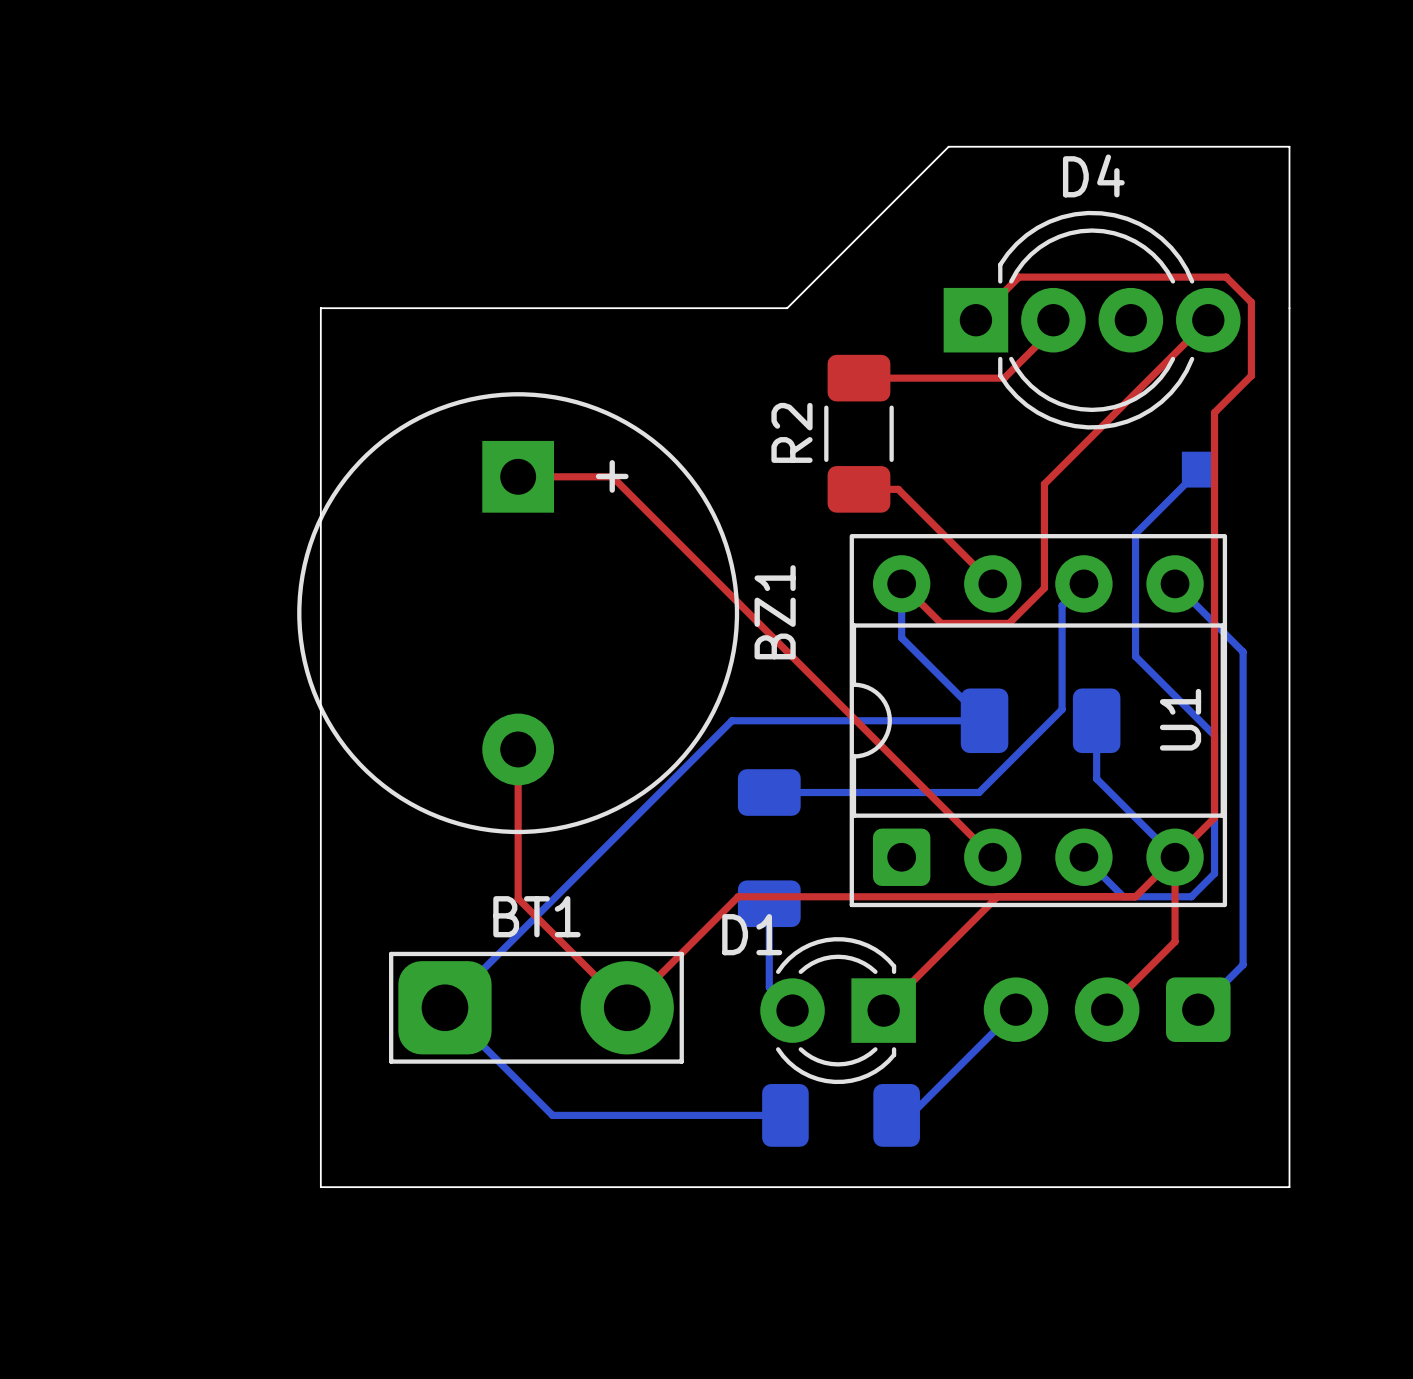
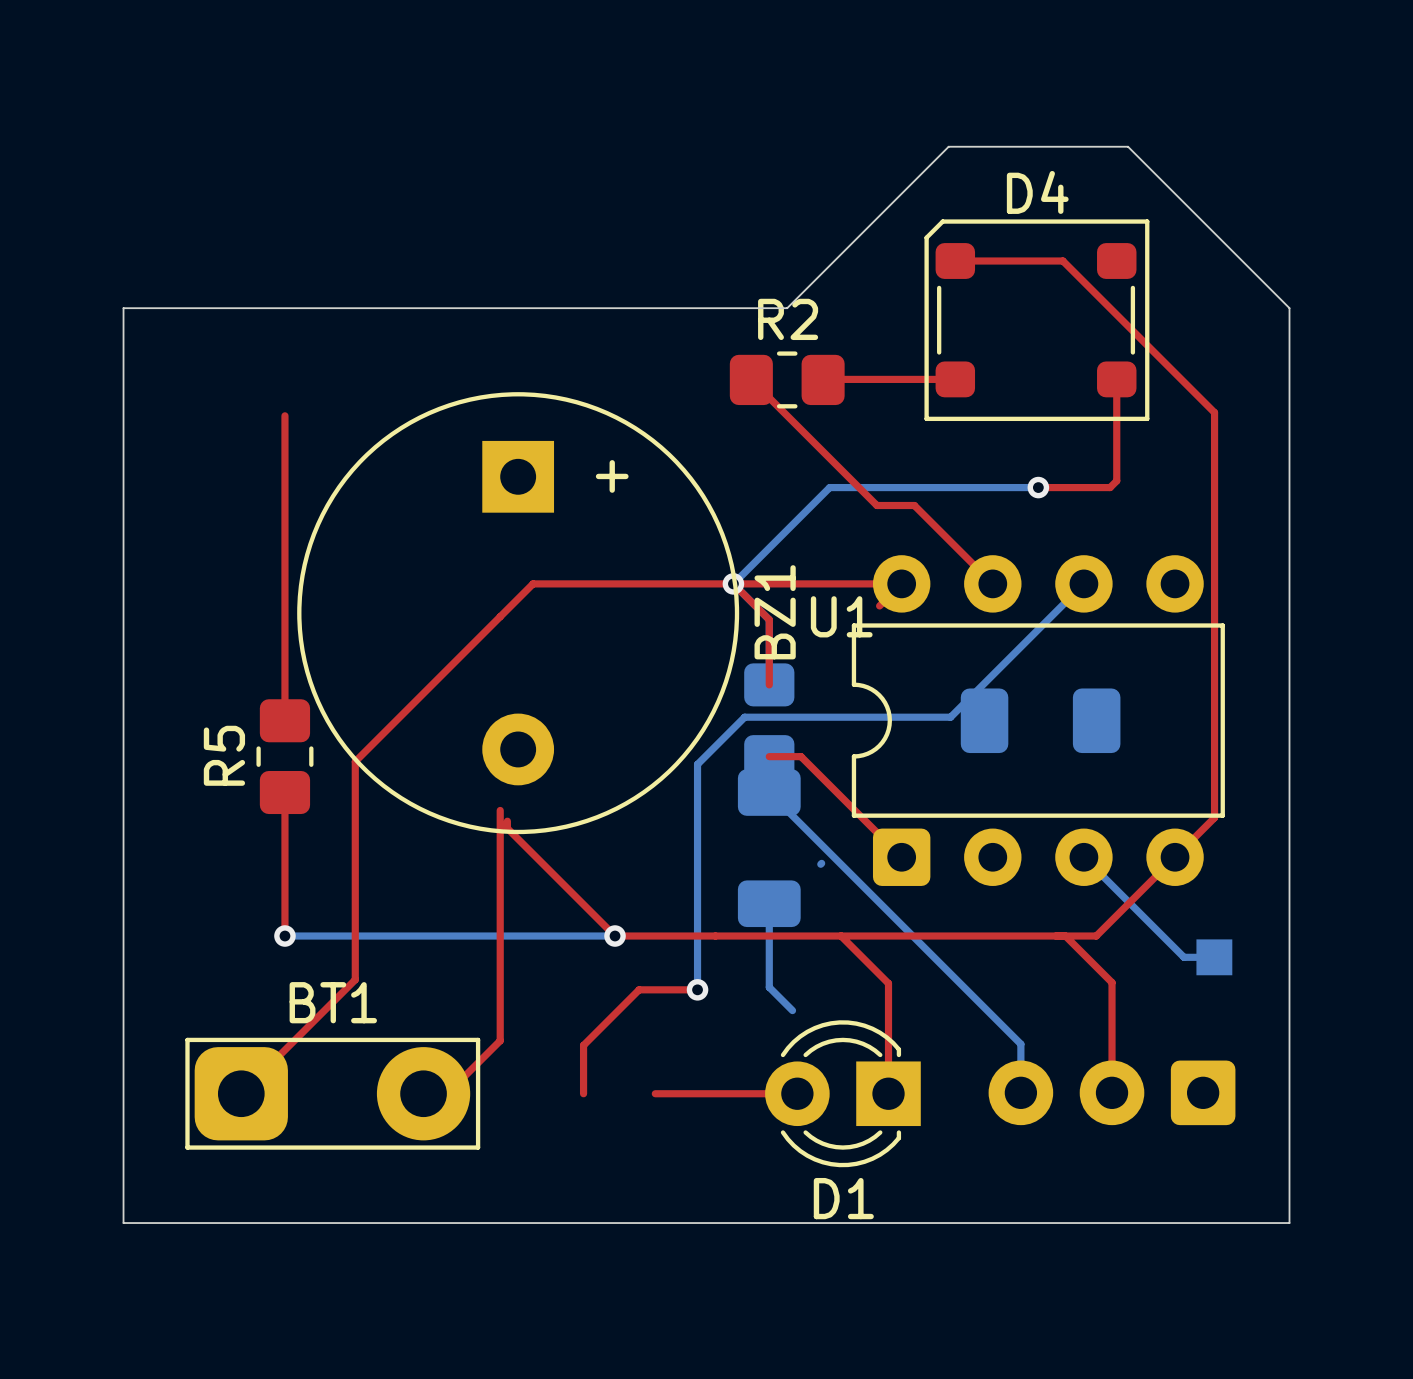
board edge: (1128, 146) (1289, 146) (1289, 308) -> (1128, 146) (1289, 308)
D4 footprint: [943, 210, 1241, 430] -> [924, 219, 1150, 422]
board edge: (320, 308) (320, 1187) (1289, 1187) -> (320, 308) (123, 308) (123, 1223) (1289, 1223) (1289, 1187)
top track: (975, 320) (1019, 277) (1226, 277) (1251, 302) (1251, 375) (1214, 412) -> (955, 261) (1062, 261) (1214, 412)
top track: (1053, 320) (1053, 329) (1004, 378) (858, 378) -> none
top track: (1208, 320) (1044, 484) (1044, 588) (1009, 623) (941, 623) (901, 583) -> none
R2 footprint: [824, 354, 894, 513] -> [729, 351, 845, 409]
top track: none -> (955, 379) (823, 379)
top track: none -> (1116, 379) (1116, 480) (1110, 487) (1038, 487)
top track: none -> (284, 415) (284, 720)
R2 name position: R2 (791, 432) -> R2 (788, 319)
bottom track: (1199, 469) (1135, 533) (1135, 656) (1214, 735) (1214, 873) (1191, 896) (1123, 896) -> (1214, 957) (1183, 957) (1123, 896)
part position: (1199, 469) -> (1214, 957)
top track: (518, 476) (612, 476) (992, 857) -> none
bottom track: none -> (1038, 487) (829, 487) (733, 583) (769, 619) (769, 684)
via: none -> (1038, 487)
top track: (858, 489) (898, 489) (914, 505) -> (751, 379) (876, 505) (914, 505)
U1 footprint: [849, 534, 1228, 908] -> [851, 555, 1225, 886]
top track: none -> (733, 583) (769, 619) (769, 684)
via: none -> (733, 583)
bottom track: (901, 583) (901, 637) (984, 720) (731, 720) (444, 1007) (552, 1115) (785, 1115) -> none
bottom track: (1175, 583) (1243, 651) (1243, 964) (1198, 1009) -> none
top track: none -> (879, 605) (901, 583) (533, 583) (355, 761) (355, 979) (241, 1093)
bottom track: (1062, 605) (1062, 709) (979, 792) (769, 792) -> (1062, 605) (950, 717) (744, 717) (697, 764) (697, 989)
U1 name position: U1 (1180, 719) -> U1 (841, 616)
part: none -> (769, 720)
bottom track: (1096, 720) (1096, 778) (1175, 857) -> none
top track: (518, 749) (518, 898) (627, 1007) (738, 896) (1135, 896) -> (507, 821) (507, 828) (615, 936) (1096, 936) (1135, 896)
R5: none -> (284, 756)
top track: none -> (769, 756) (801, 756) (901, 857)
bottom track: none -> (769, 756) (769, 792) (1020, 1044) (1020, 1092)
top track: none -> (267, 792) (284, 792) (284, 936)
top track: none -> (500, 810) (500, 1040) (447, 1093) (423, 1093)
top track: (1175, 857) (1175, 941) (1107, 1009) -> none
bottom track: none -> (821, 863) (820, 864)
top track: (997, 896) (883, 1010) -> none
D1 name position: D1 (752, 934) -> D1 (843, 1198)
bottom track: none -> (284, 936) (615, 936)
via: none -> (284, 936)
via: none -> (615, 936)
top track: none -> (841, 936) (888, 983) (888, 1093)
top track: none -> (1065, 936) (1112, 982) (1112, 1092)
top track: none -> (697, 989) (639, 989) (583, 1045) (583, 1093)
via: none -> (697, 989)
BT1 position: (536, 1007) -> (332, 1093)
bottom track: (1016, 1009) (912, 1112) (912, 1115) (896, 1115) -> none
part position: (1107, 1009) -> (1112, 1092)
D1 position: (838, 1010) -> (842, 1093)
top track: none -> (655, 1093) (797, 1093)
part: (841, 1115) -> none

